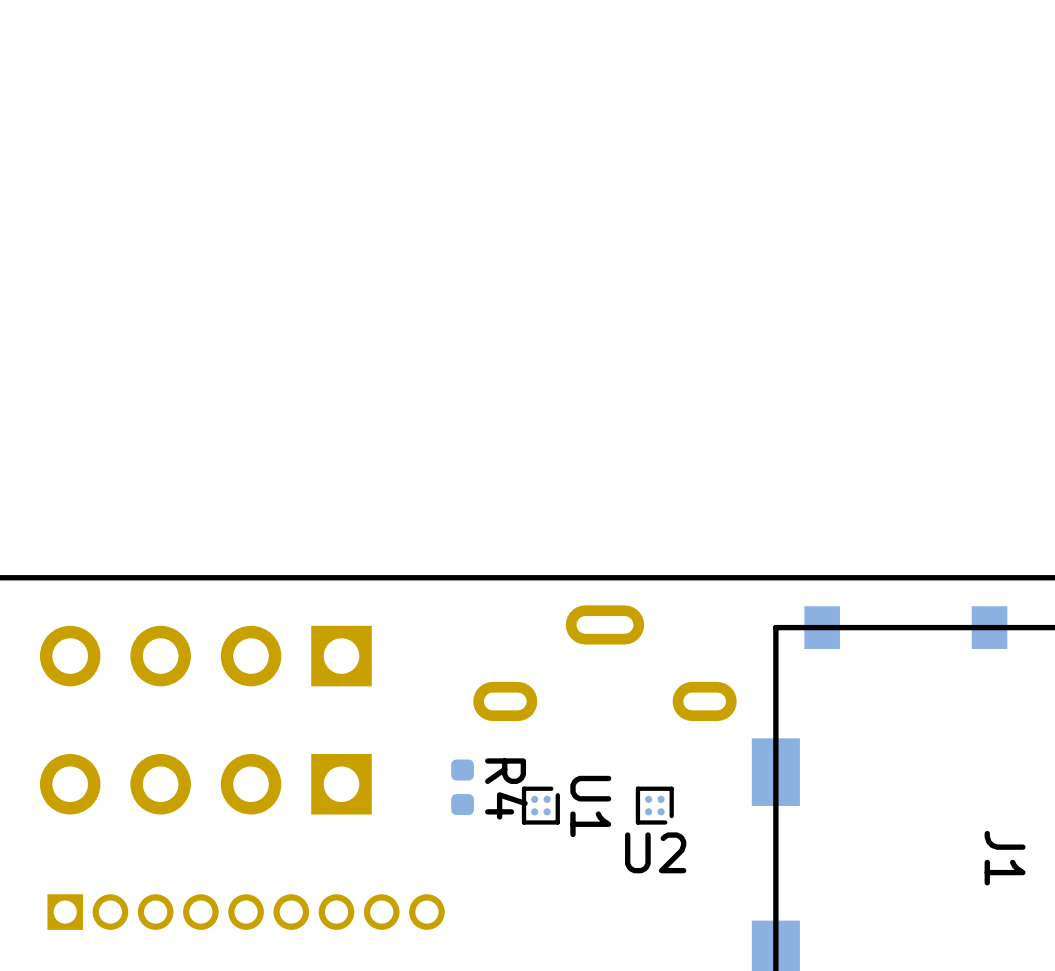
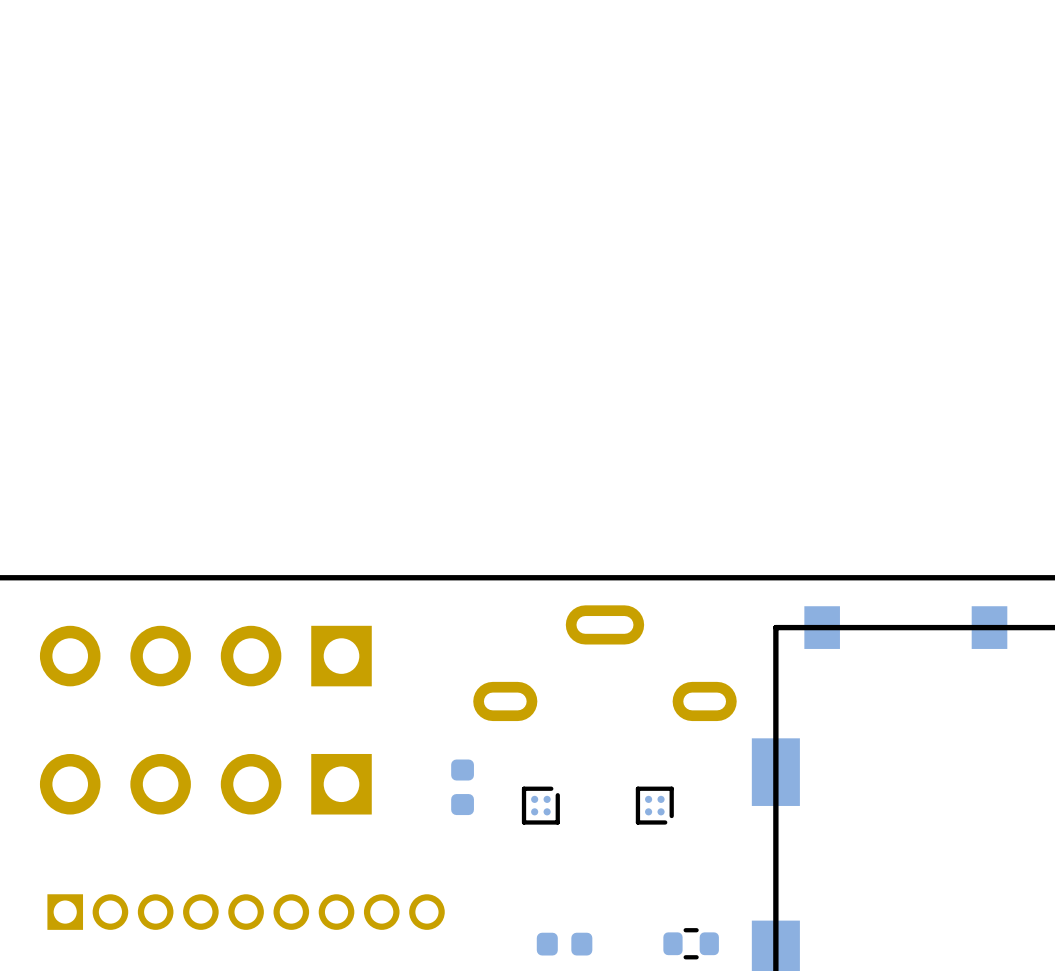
R4 name: R4 (506, 788) -> none
U1 name: U1 (590, 806) -> none
U2 name: U2 (655, 852) -> none
J1 name: J1 (1005, 858) -> none
part: none -> (691, 943)
part: none -> (564, 944)

